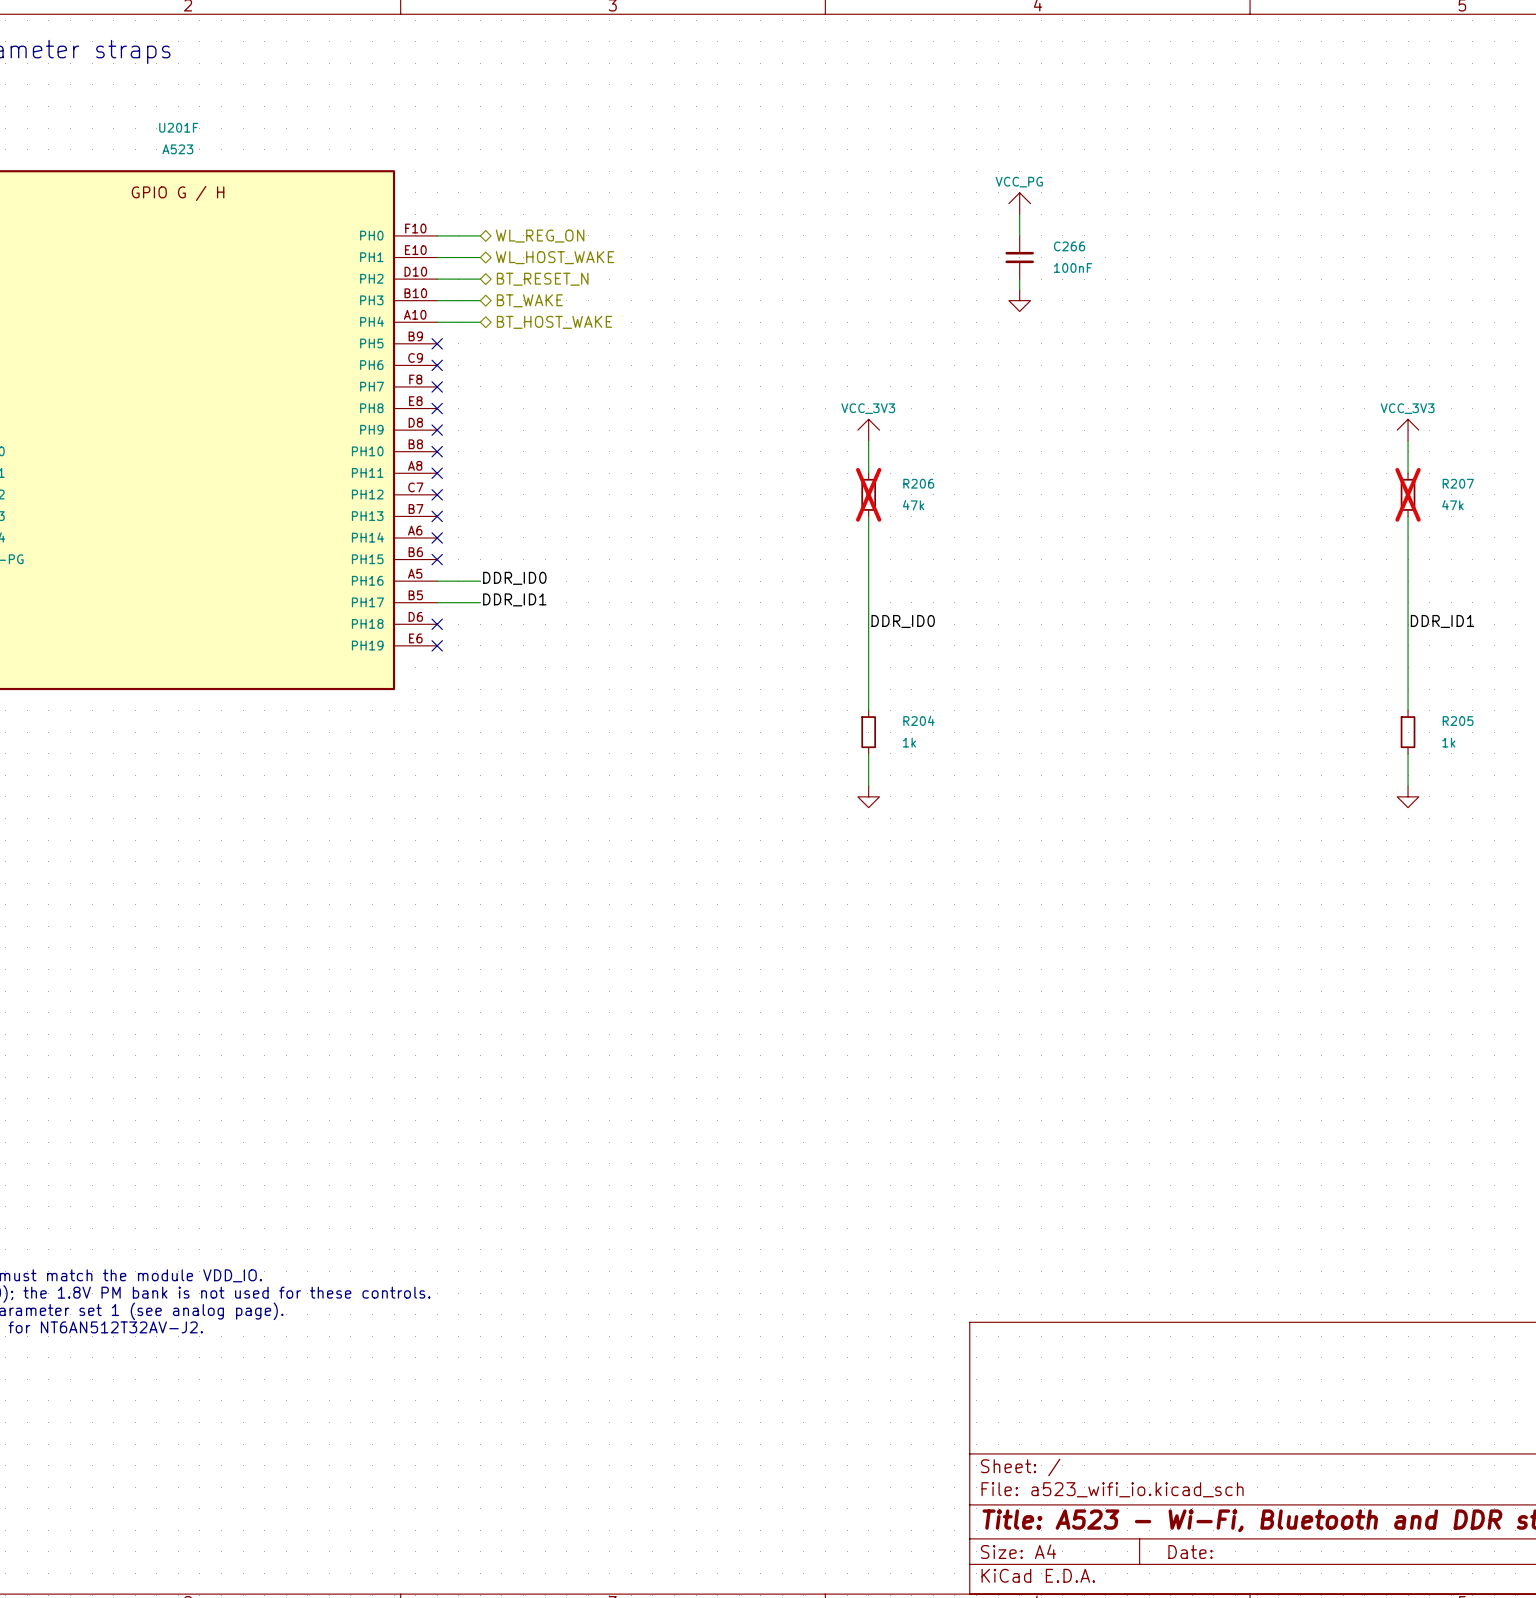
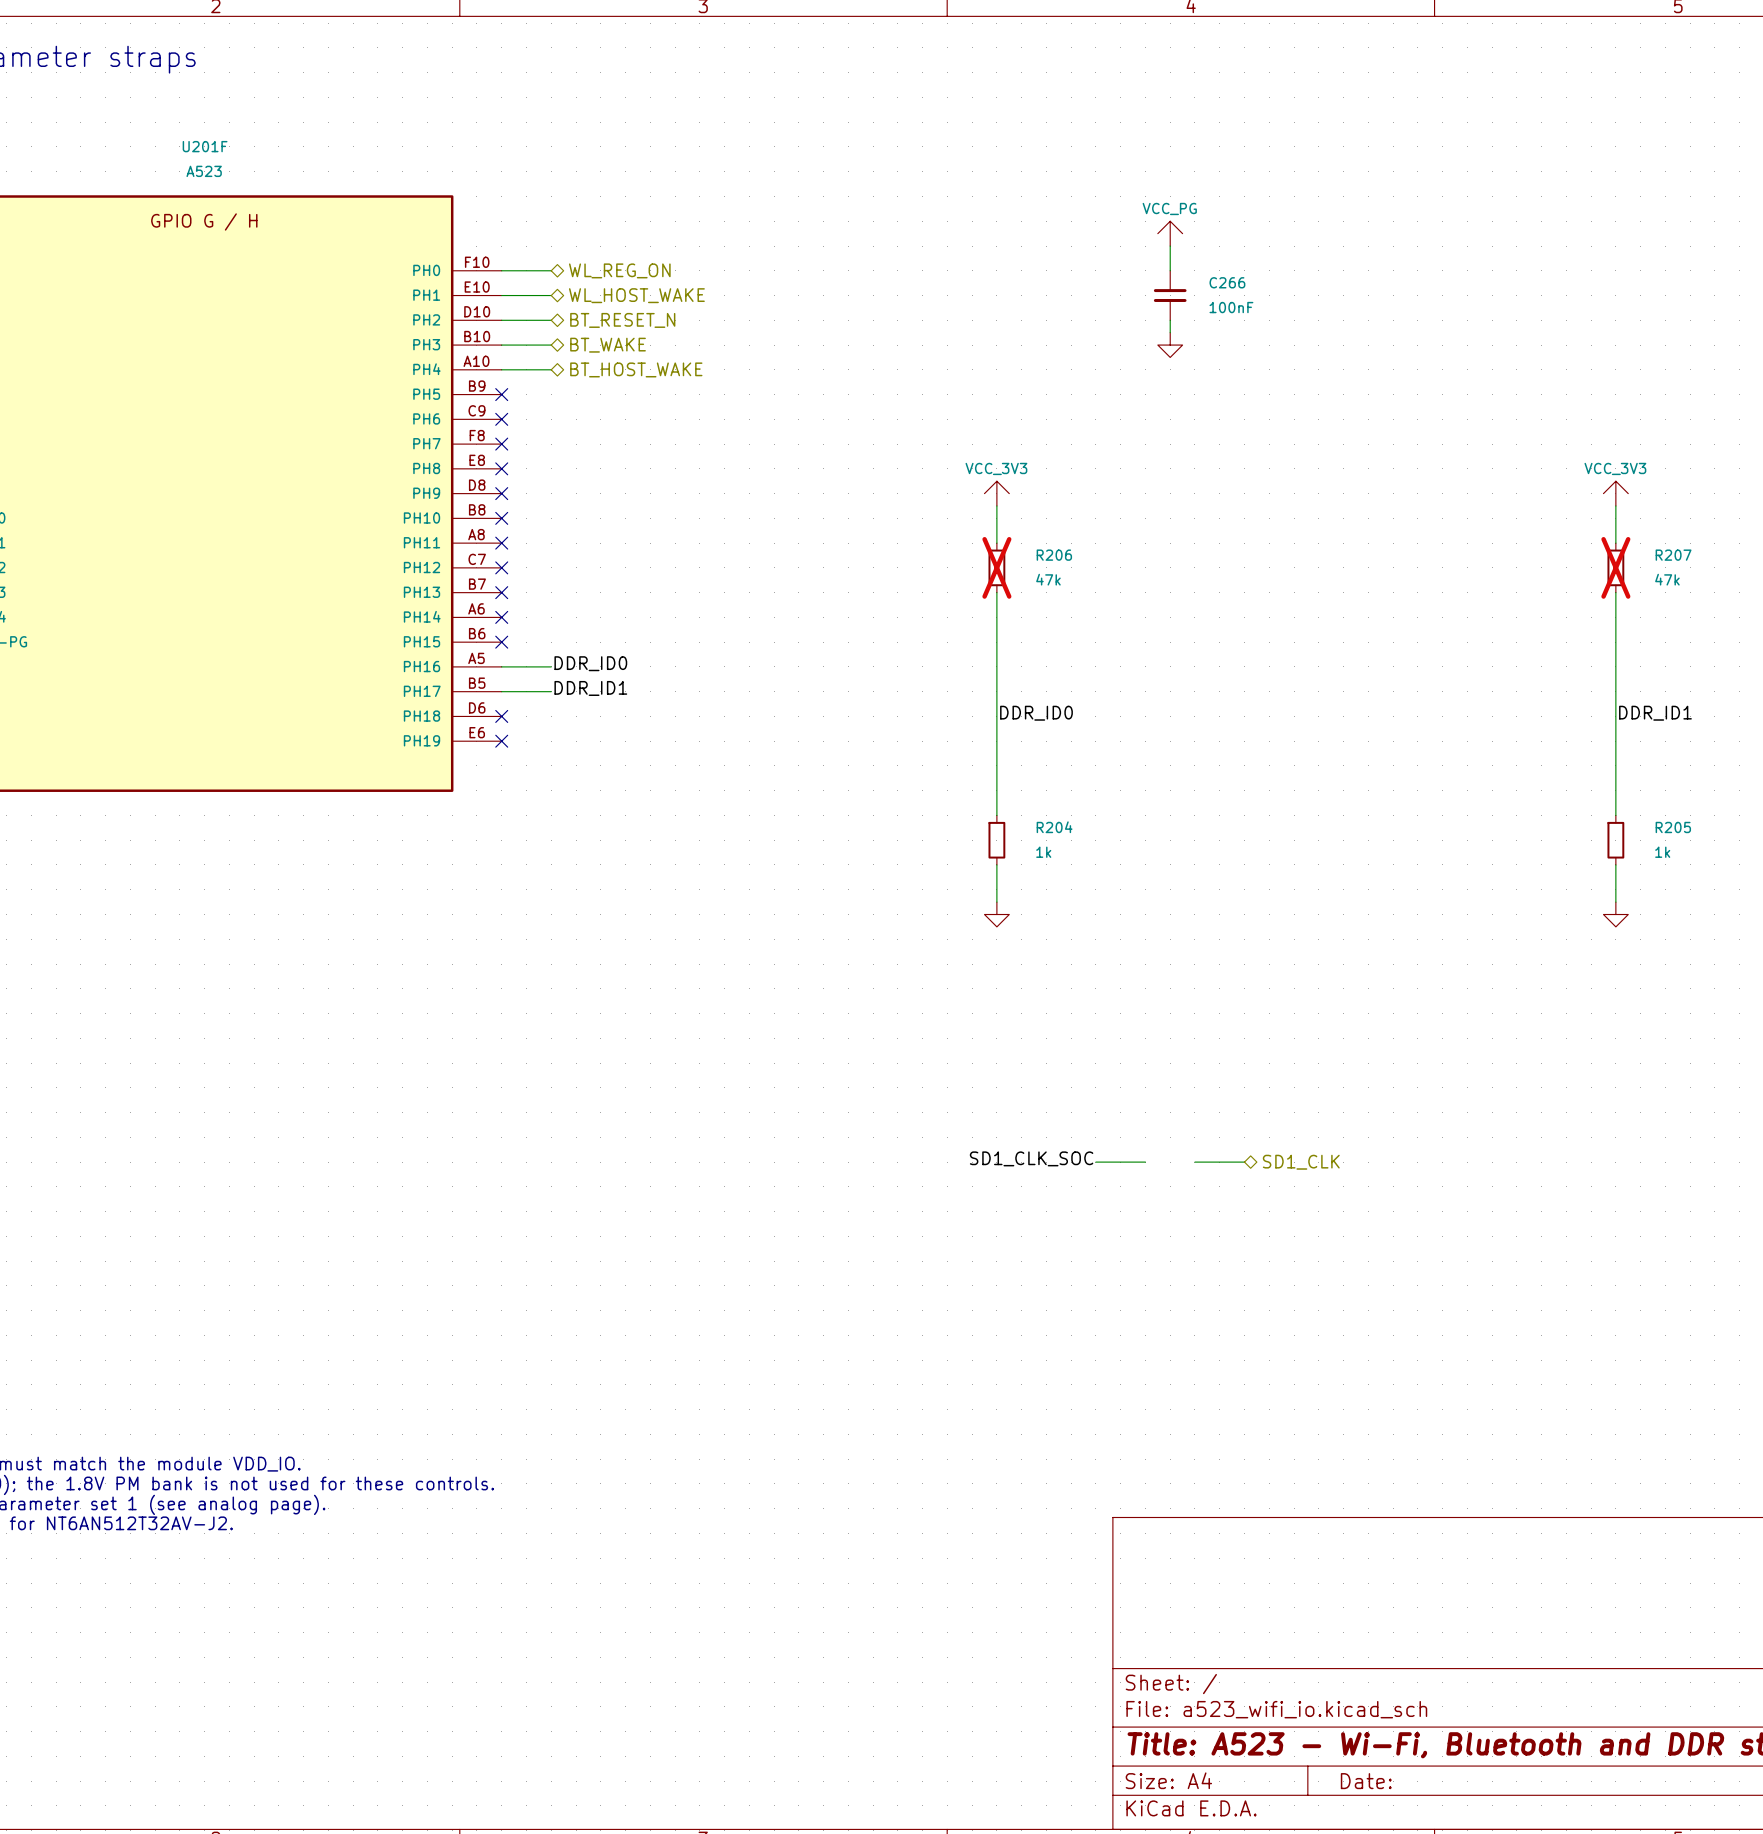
label: none -> SD1_CLK_SOC (1031, 1158)
wire: none -> (1095, 1162) (1145, 1162)
wire: none -> (1194, 1162) (1244, 1162)
hierarchical label: none -> SD1_CLK (1301, 1162)

